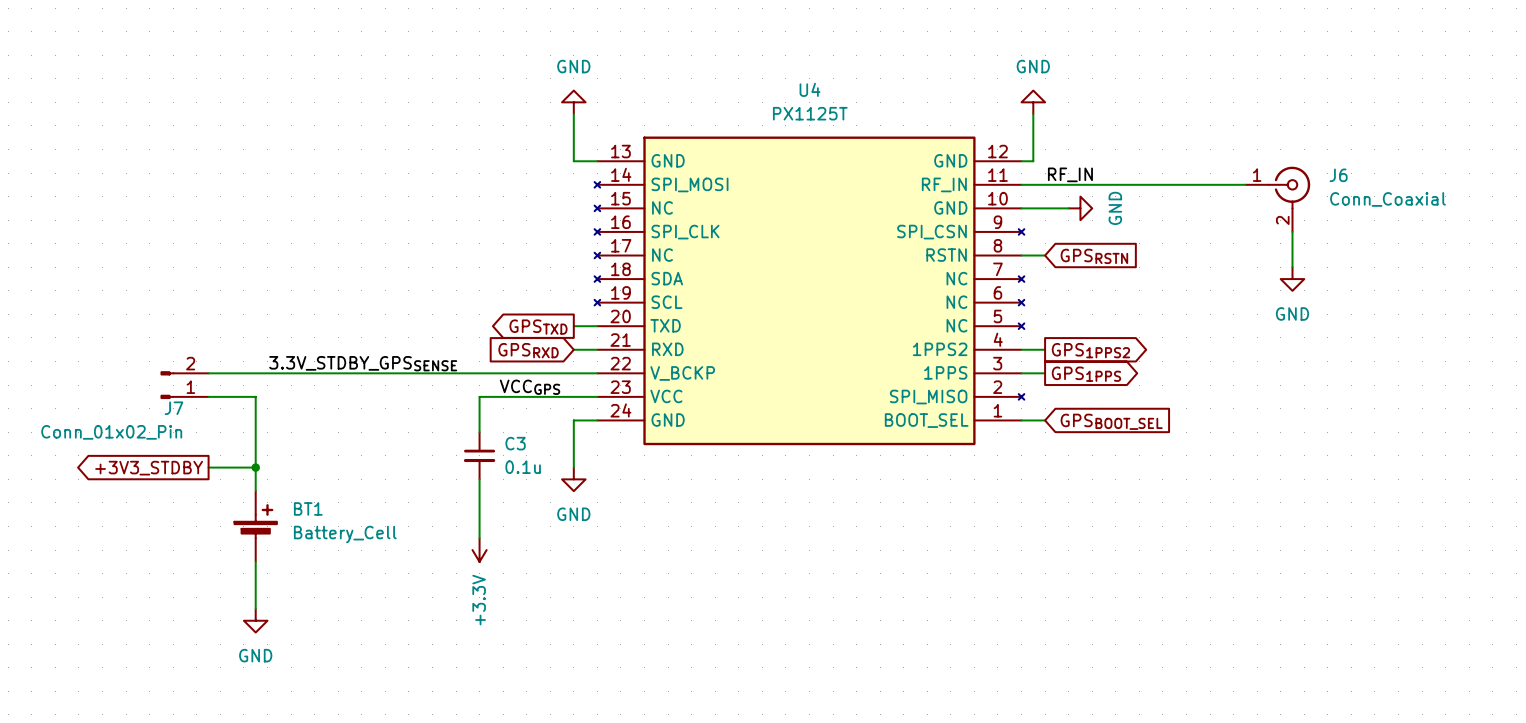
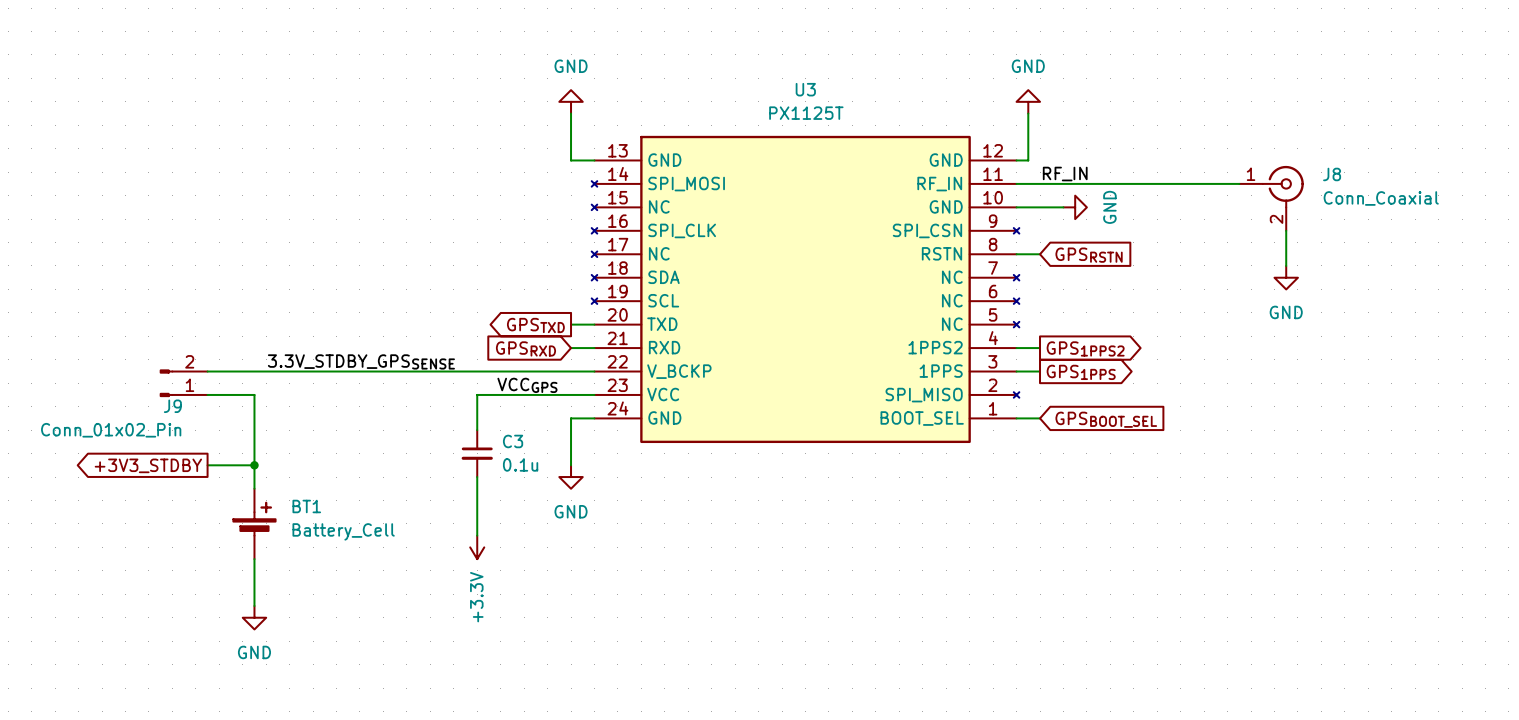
U4 name: U4 (810, 89) -> U3 (805, 89)
J6 name: J6 (1338, 175) -> J8 (1332, 174)
J7 name: J7 (173, 408) -> J9 (172, 406)

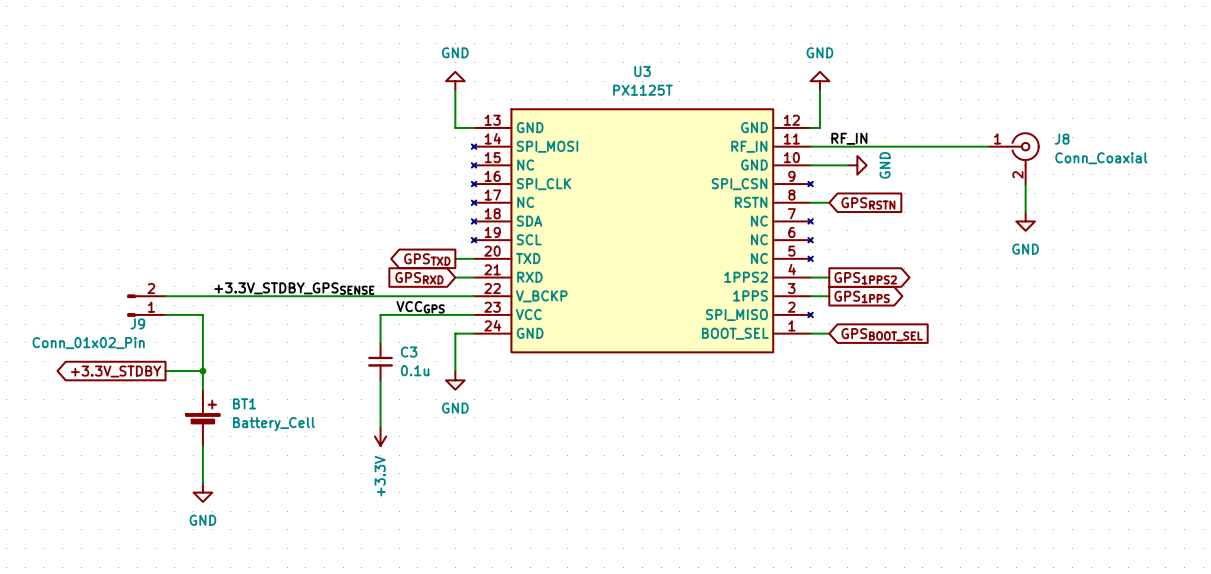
label: 3.3V_STDBY_GPSSENSE (361, 361) -> +3.3V_STDBY_GPSSENSE (294, 288)
global label: +3V3_STDBY (148, 465) -> +3.3V_STDBY (116, 371)

